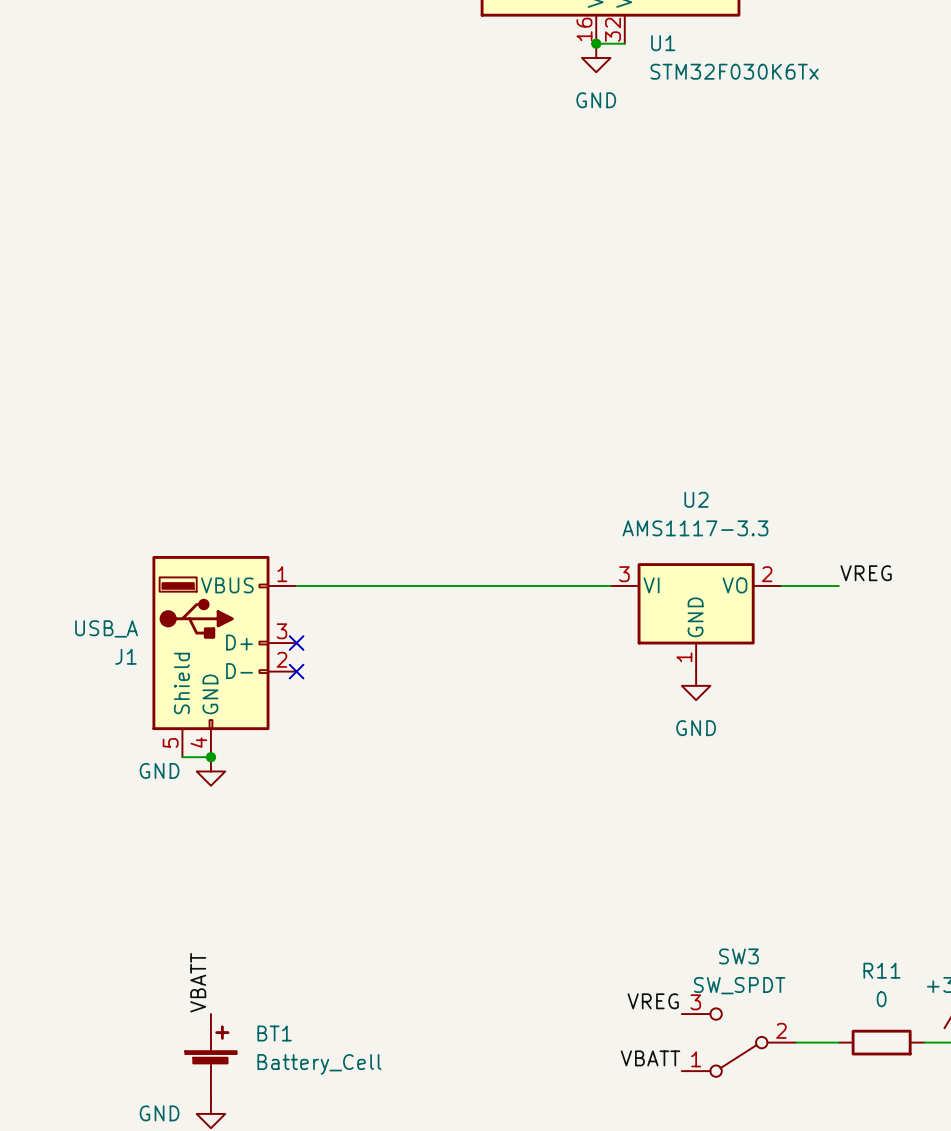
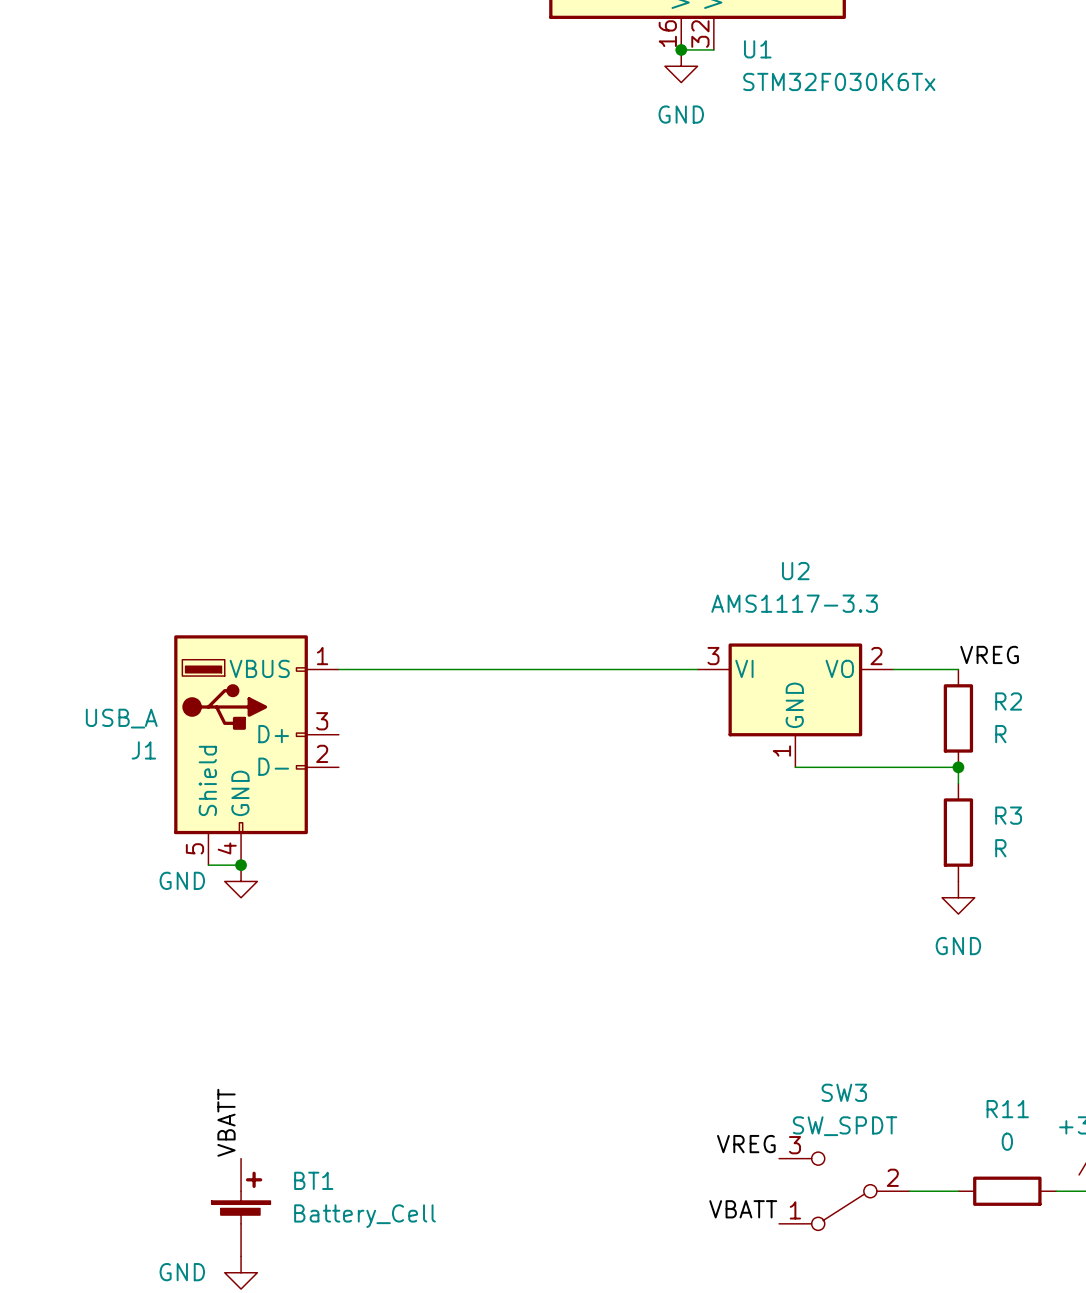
R2: none -> R (958, 718)
no-connect mark: (296, 643) -> none
no-connect mark: (296, 671) -> none
wire: none -> (795, 767) (958, 767) (958, 783)
junction: none -> (958, 767)
power symbol position: GND (696, 685) -> GND (958, 897)
R3: none -> R (958, 832)

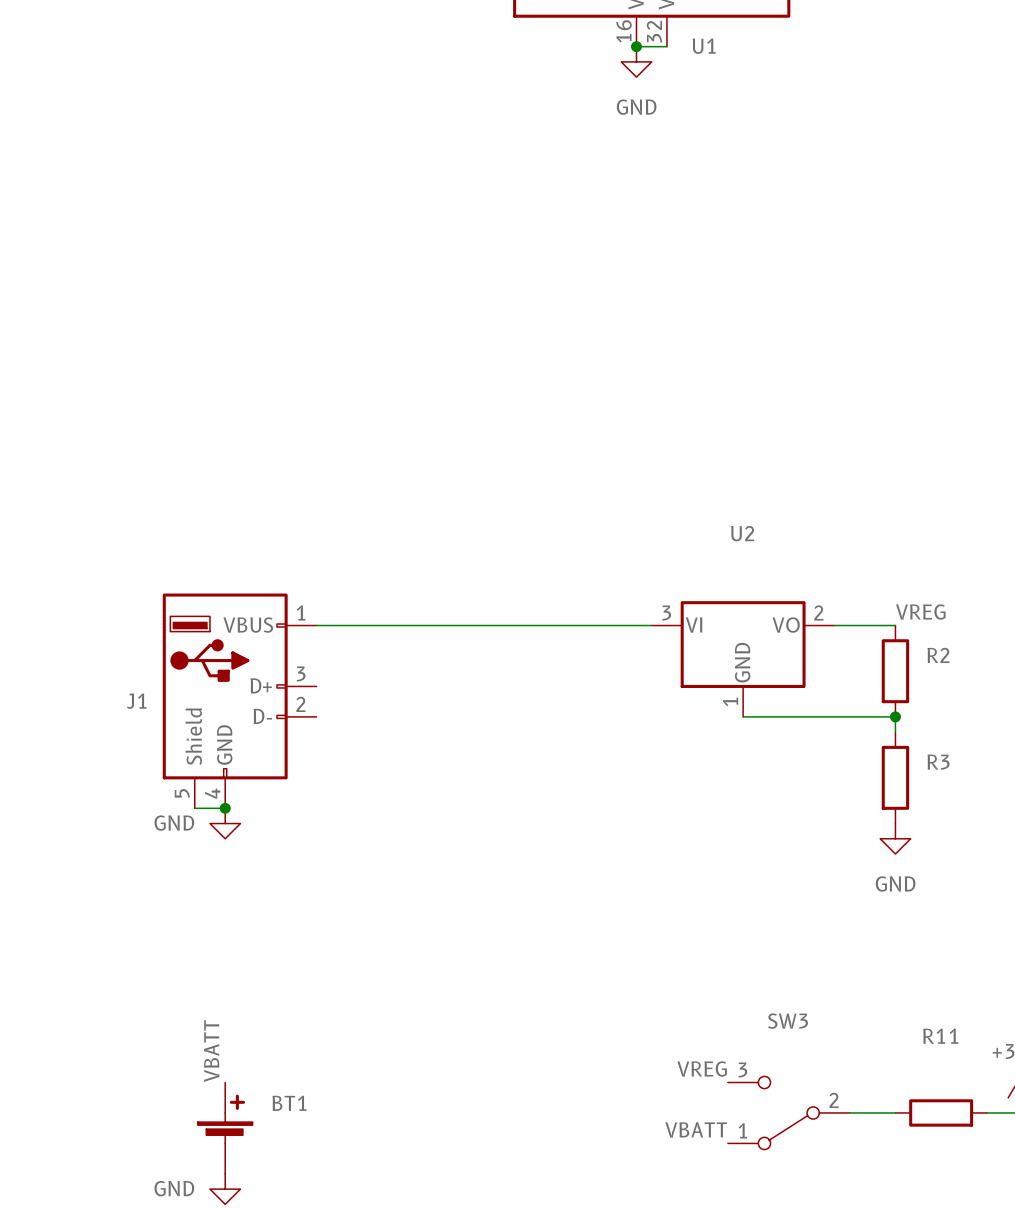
U1 value: STM32F030K6Tx (839, 81) -> none
U2 value: AMS1117-3.3 (794, 603) -> none
J1 value: USB_A (121, 718) -> none
R2 value: R (1000, 734) -> none
R3 value: R (1000, 848) -> none
SW3 value: SW_SPDT (845, 1126) -> none
R11 value: 0 (1007, 1141) -> none
BT1 value: Battery_Cell (365, 1216) -> none

